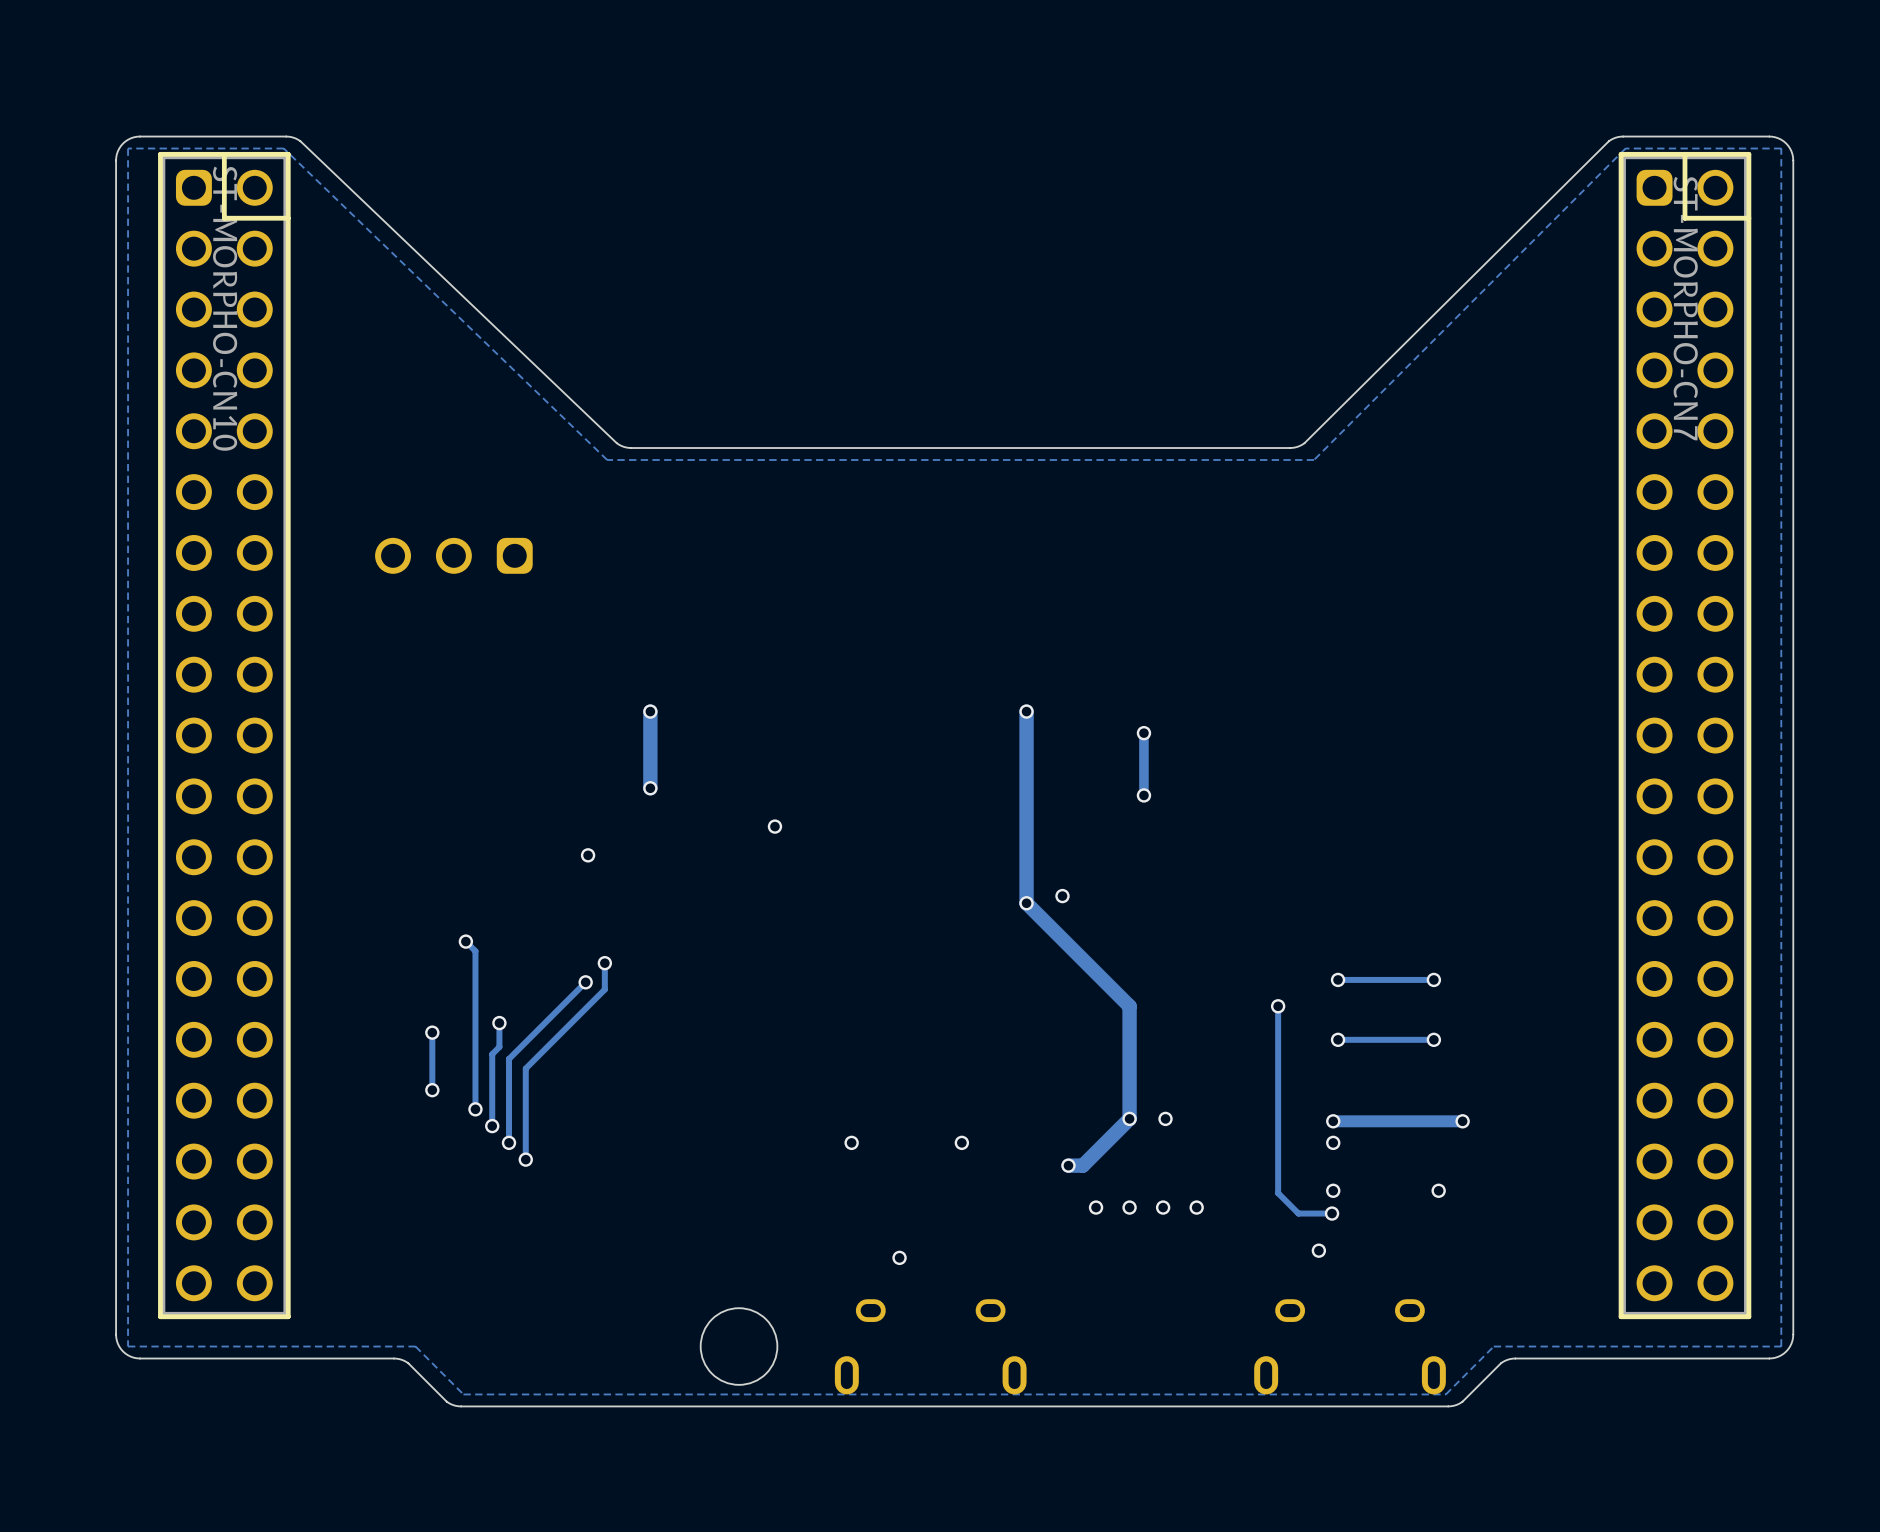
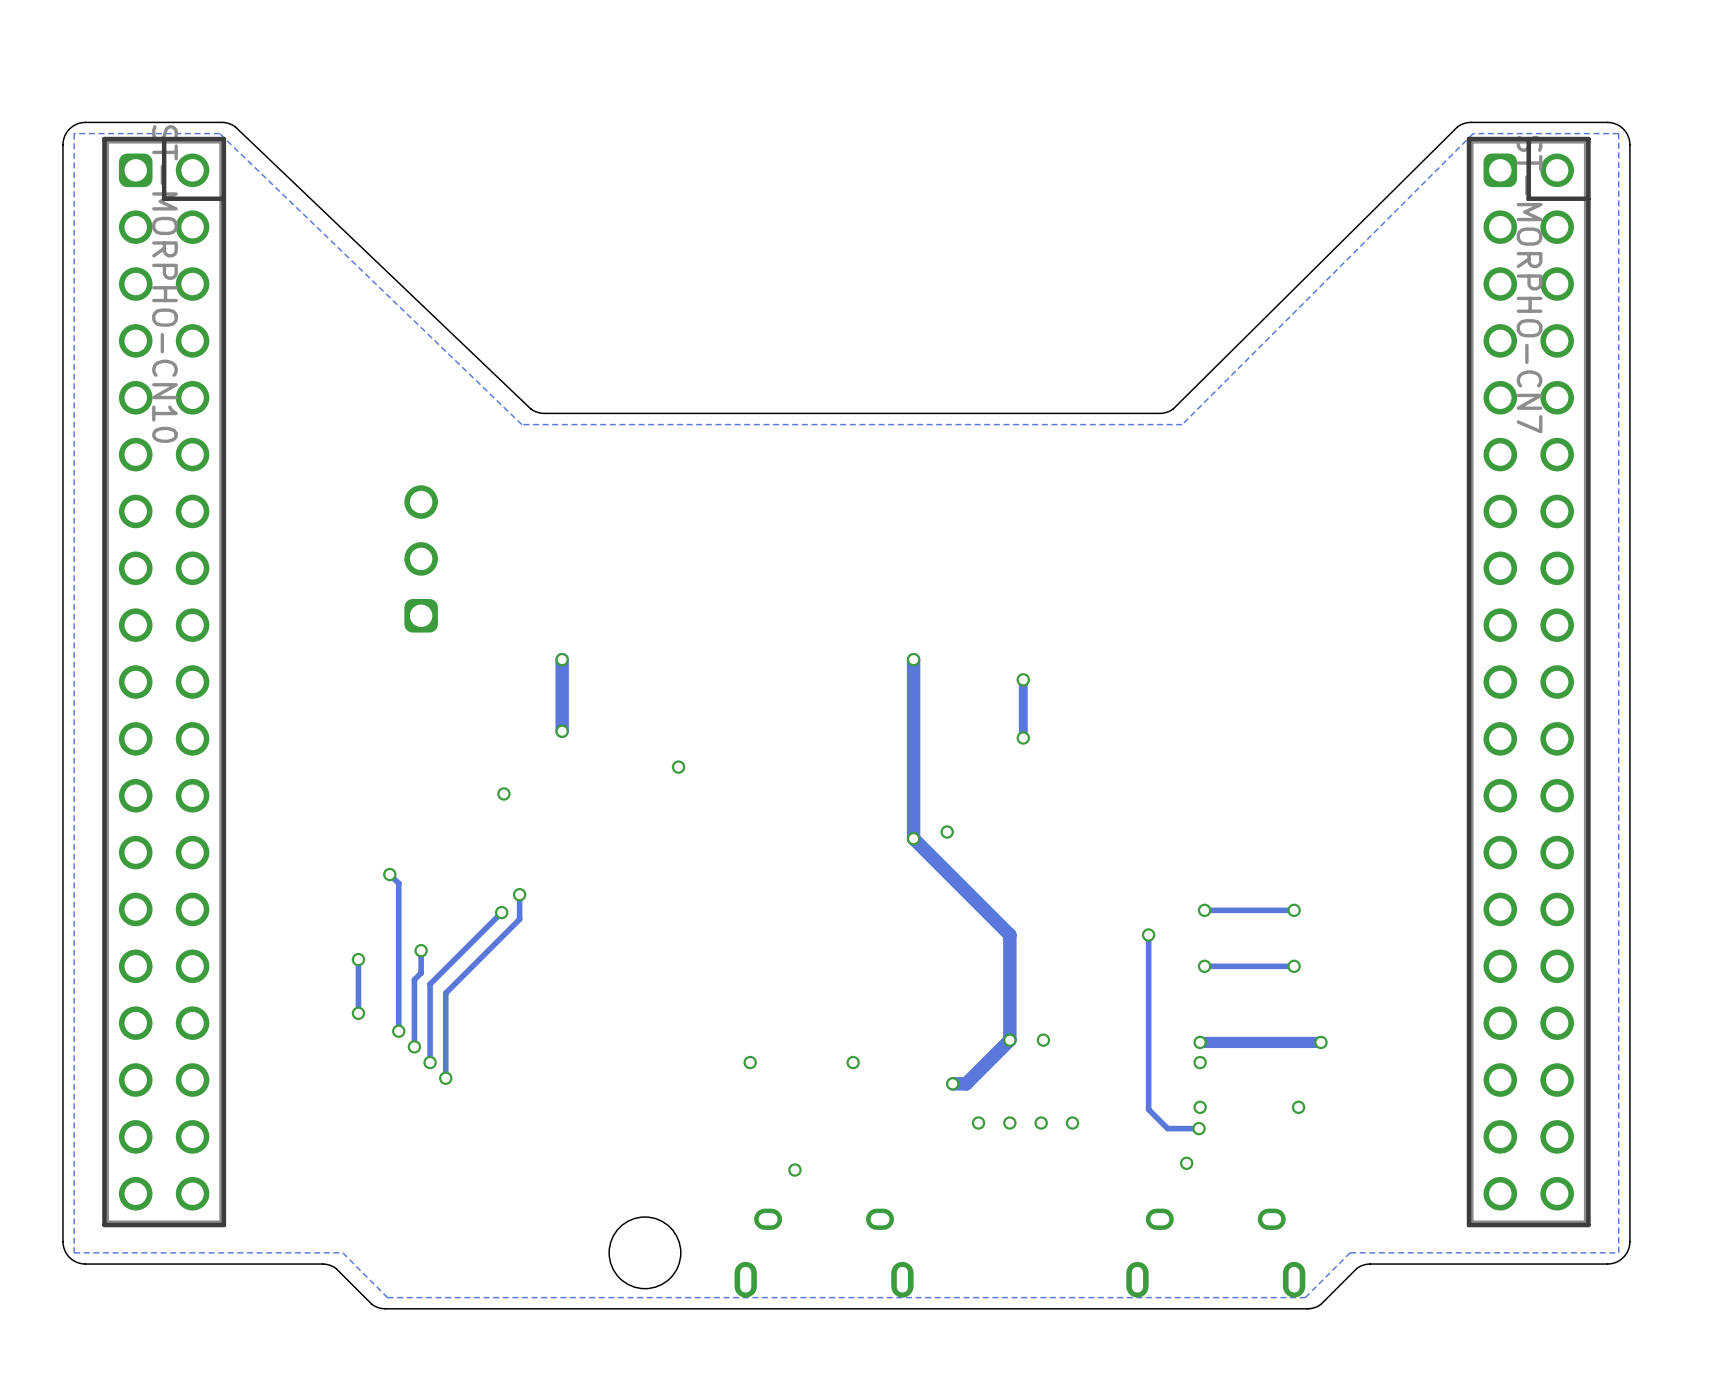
part rotation: 0° (453, 555) -> 90° clockwise (421, 558)

